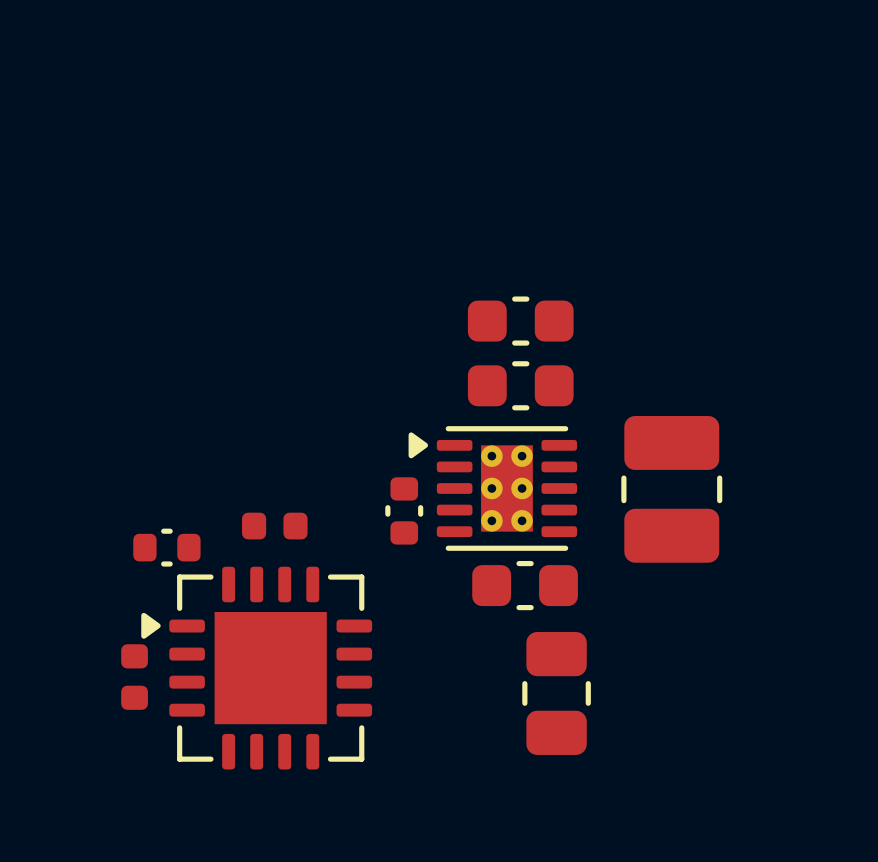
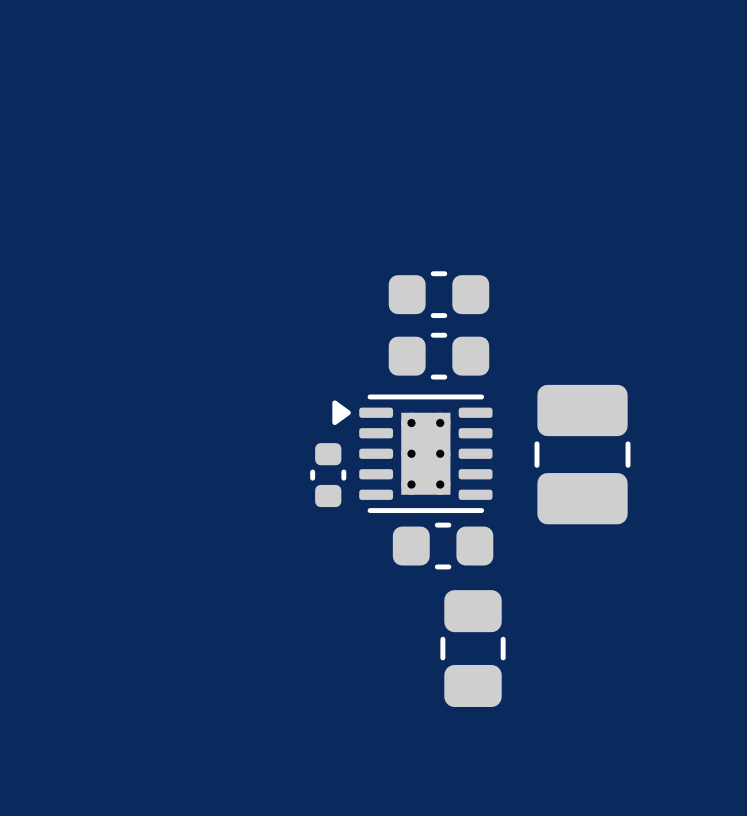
part: (274, 526) -> none
part: (166, 547) -> none
part: (256, 668) -> none
part: (134, 677) -> none

